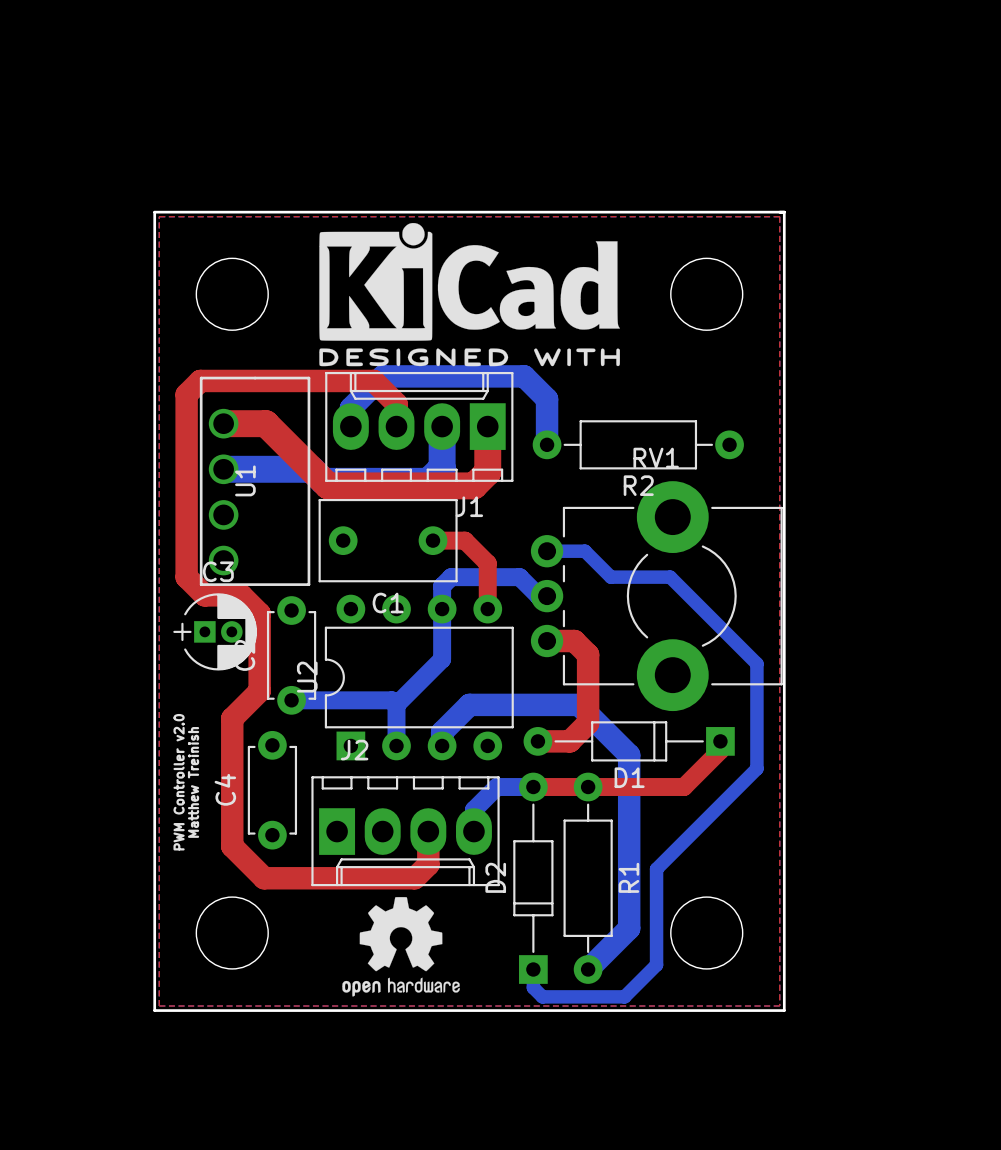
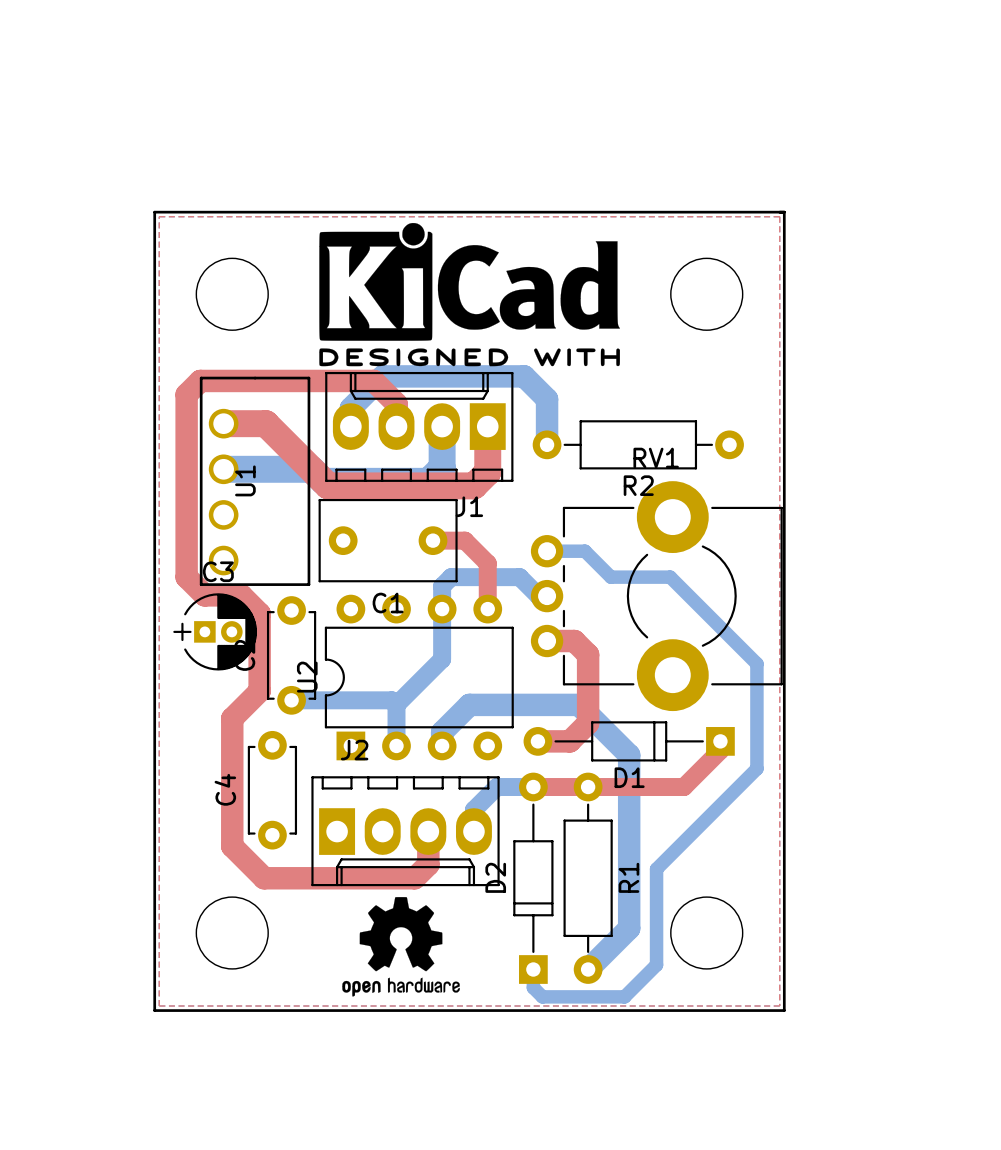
text: PWM Controller v2.0 (179, 782) -> none
text: Matthew Treinish (193, 782) -> none

